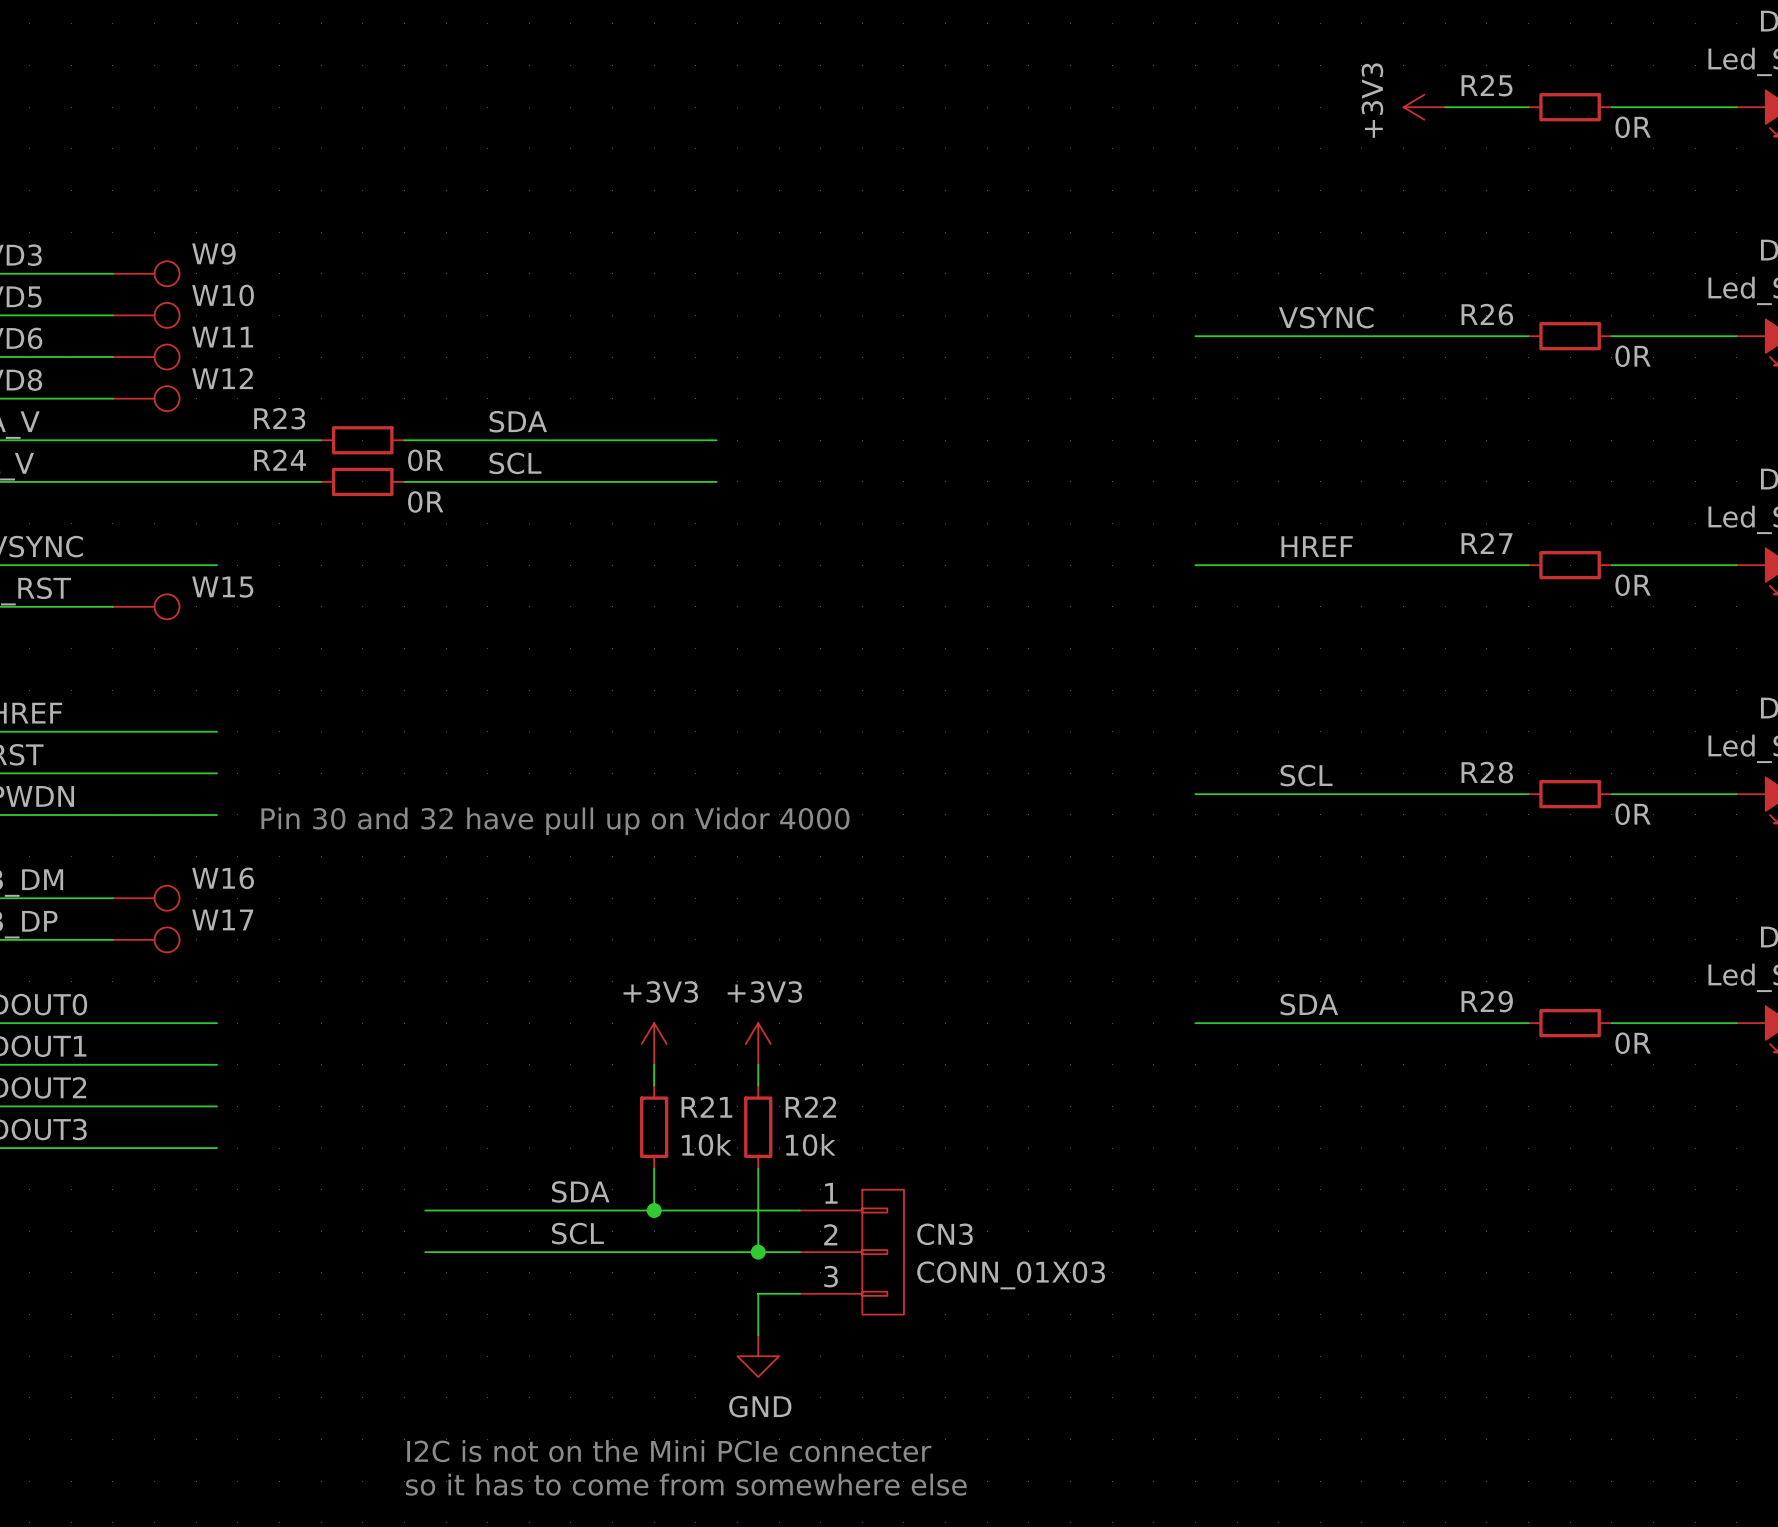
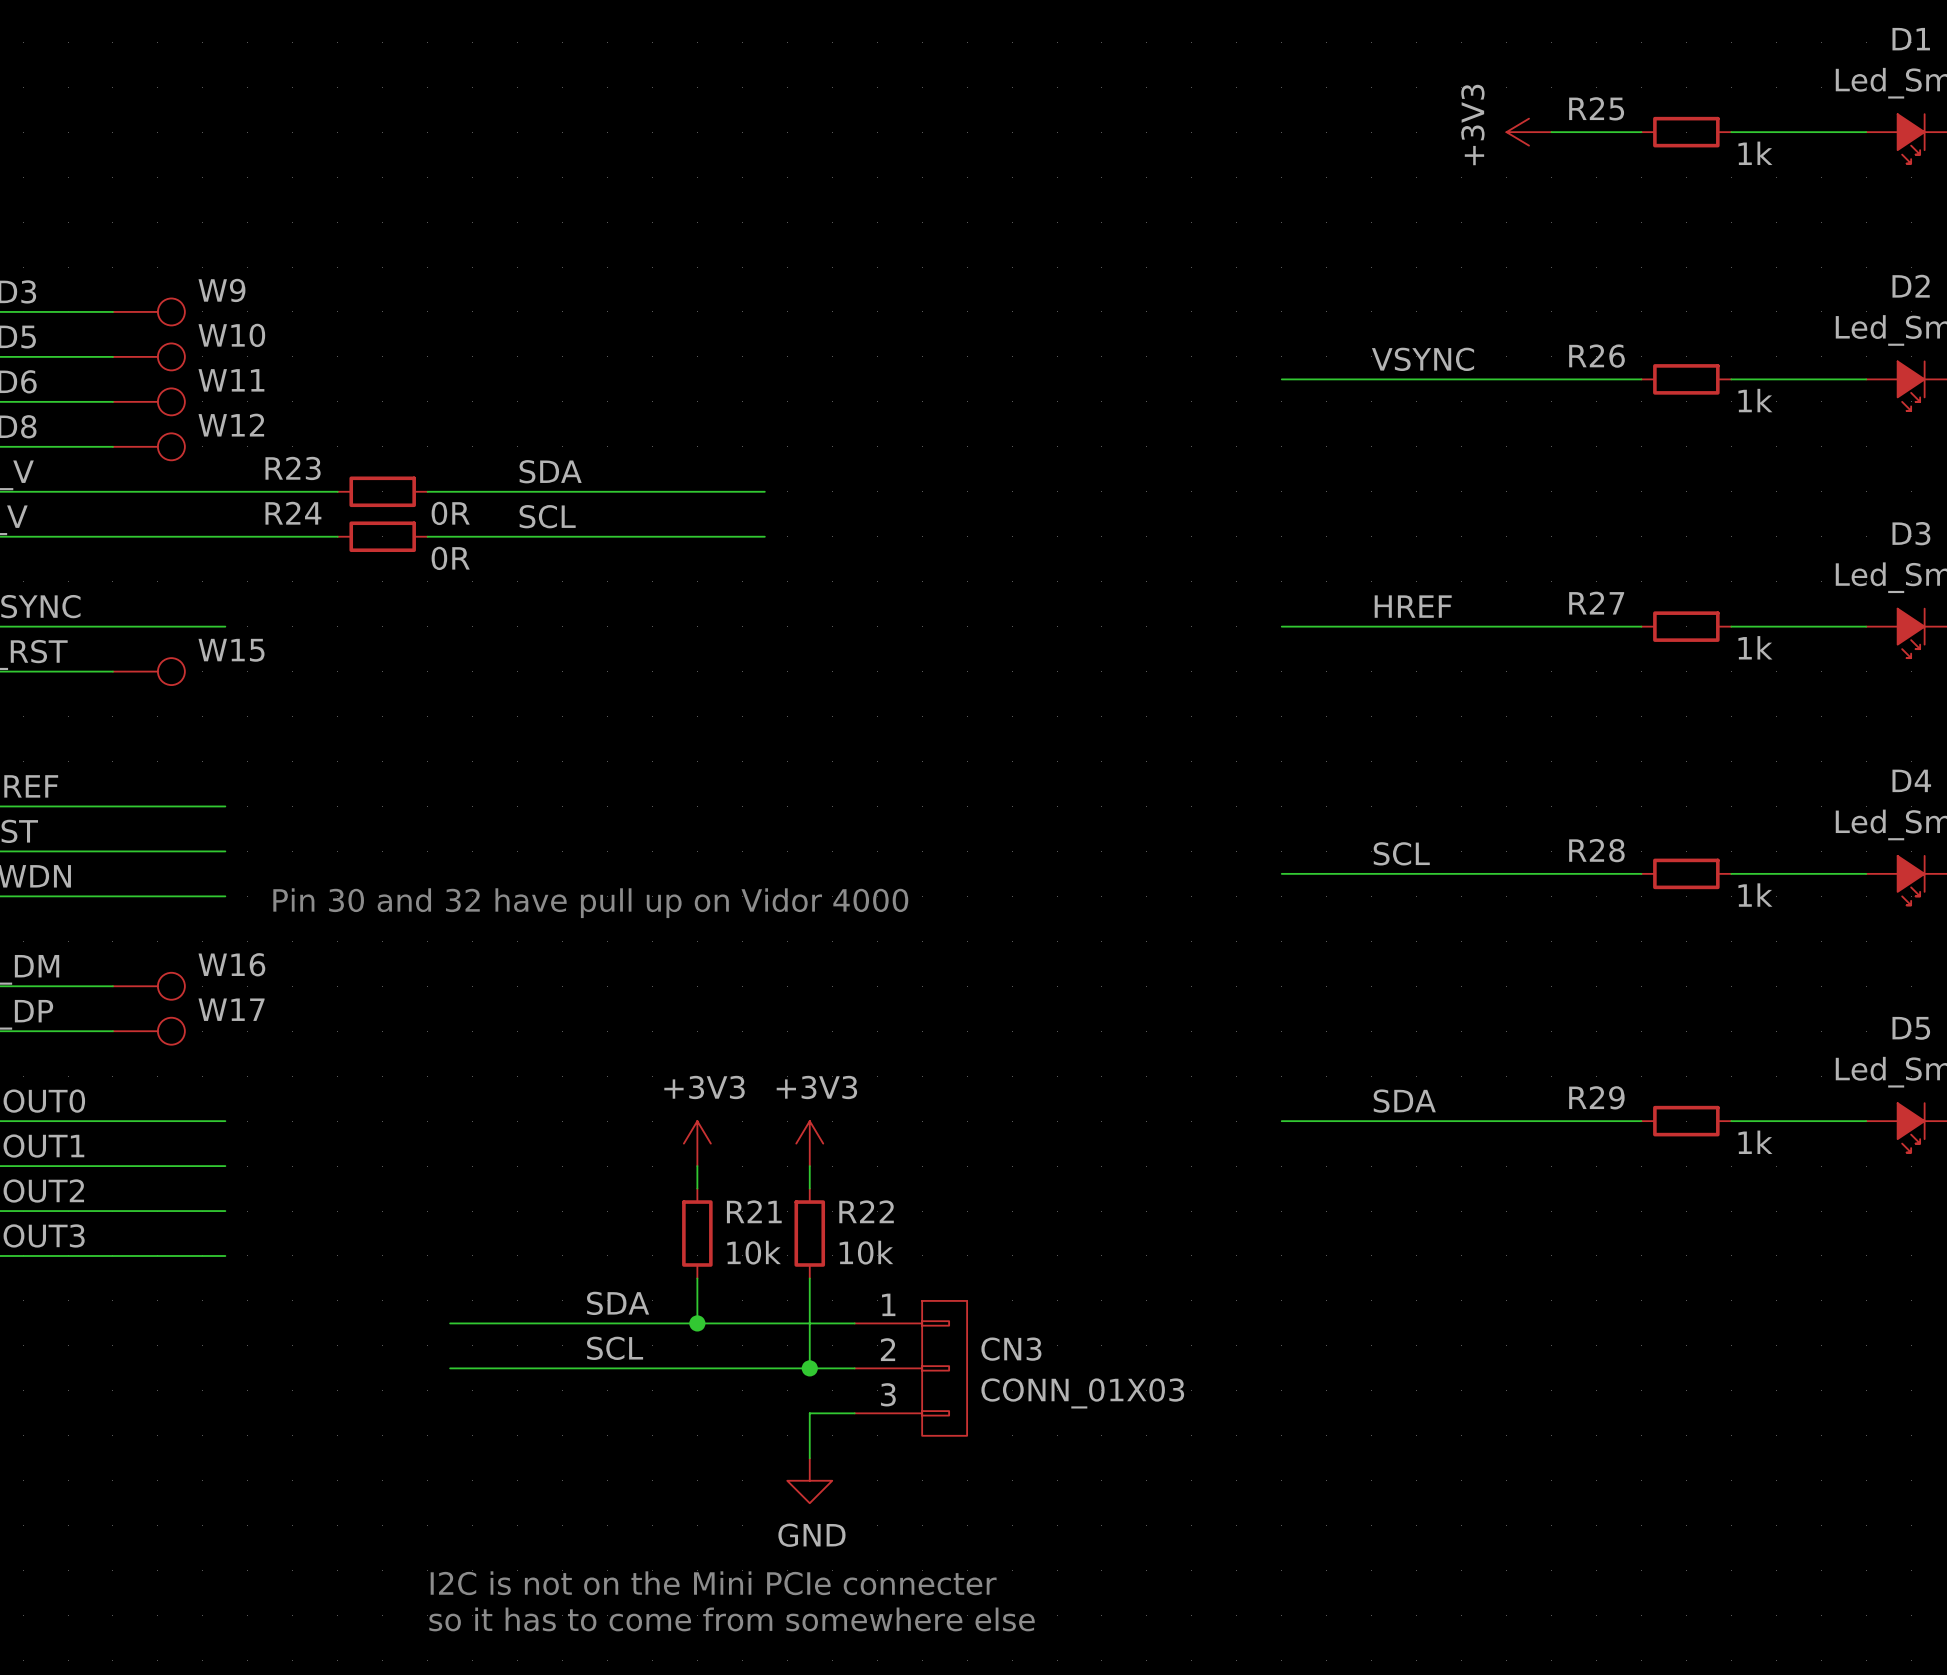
R25 value: 0R (1633, 127) -> 1k (1755, 153)
R26 value: 0R (1633, 356) -> 1k (1755, 400)
R27 value: 0R (1633, 585) -> 1k (1755, 647)
R28 value: 0R (1633, 814) -> 1k (1755, 895)
R29 value: 0R (1633, 1043) -> 1k (1755, 1142)

